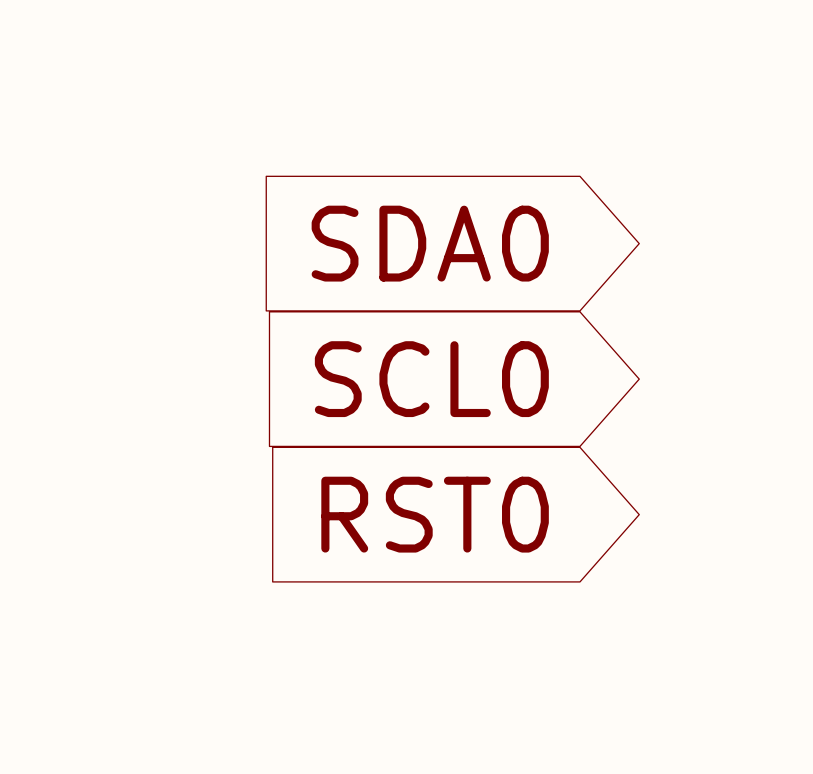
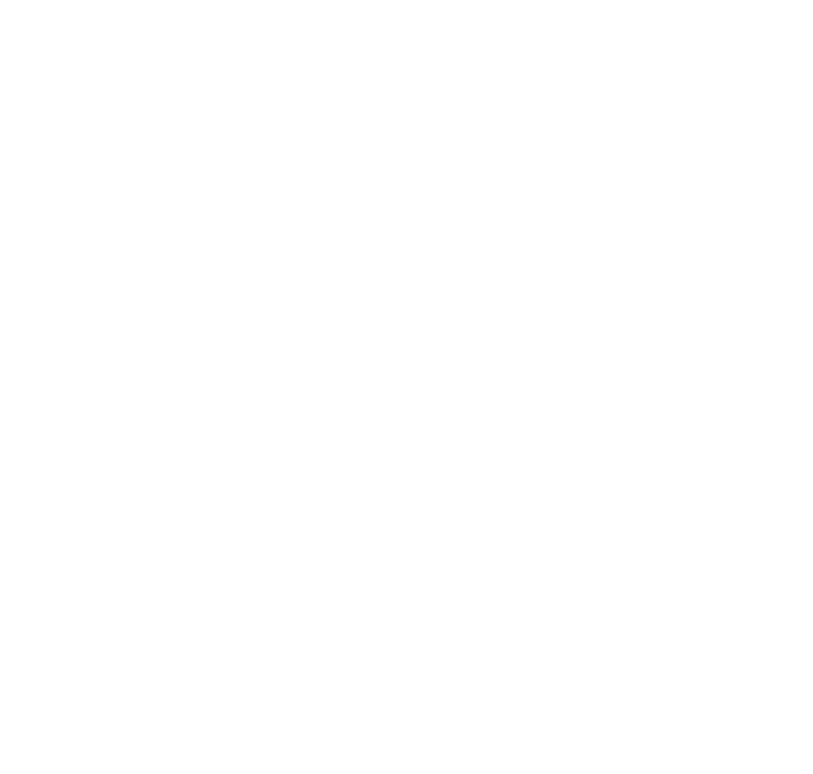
global label: SDA0 (430, 243) -> none
global label: SCL0 (431, 379) -> none
global label: RST0 (435, 514) -> none

